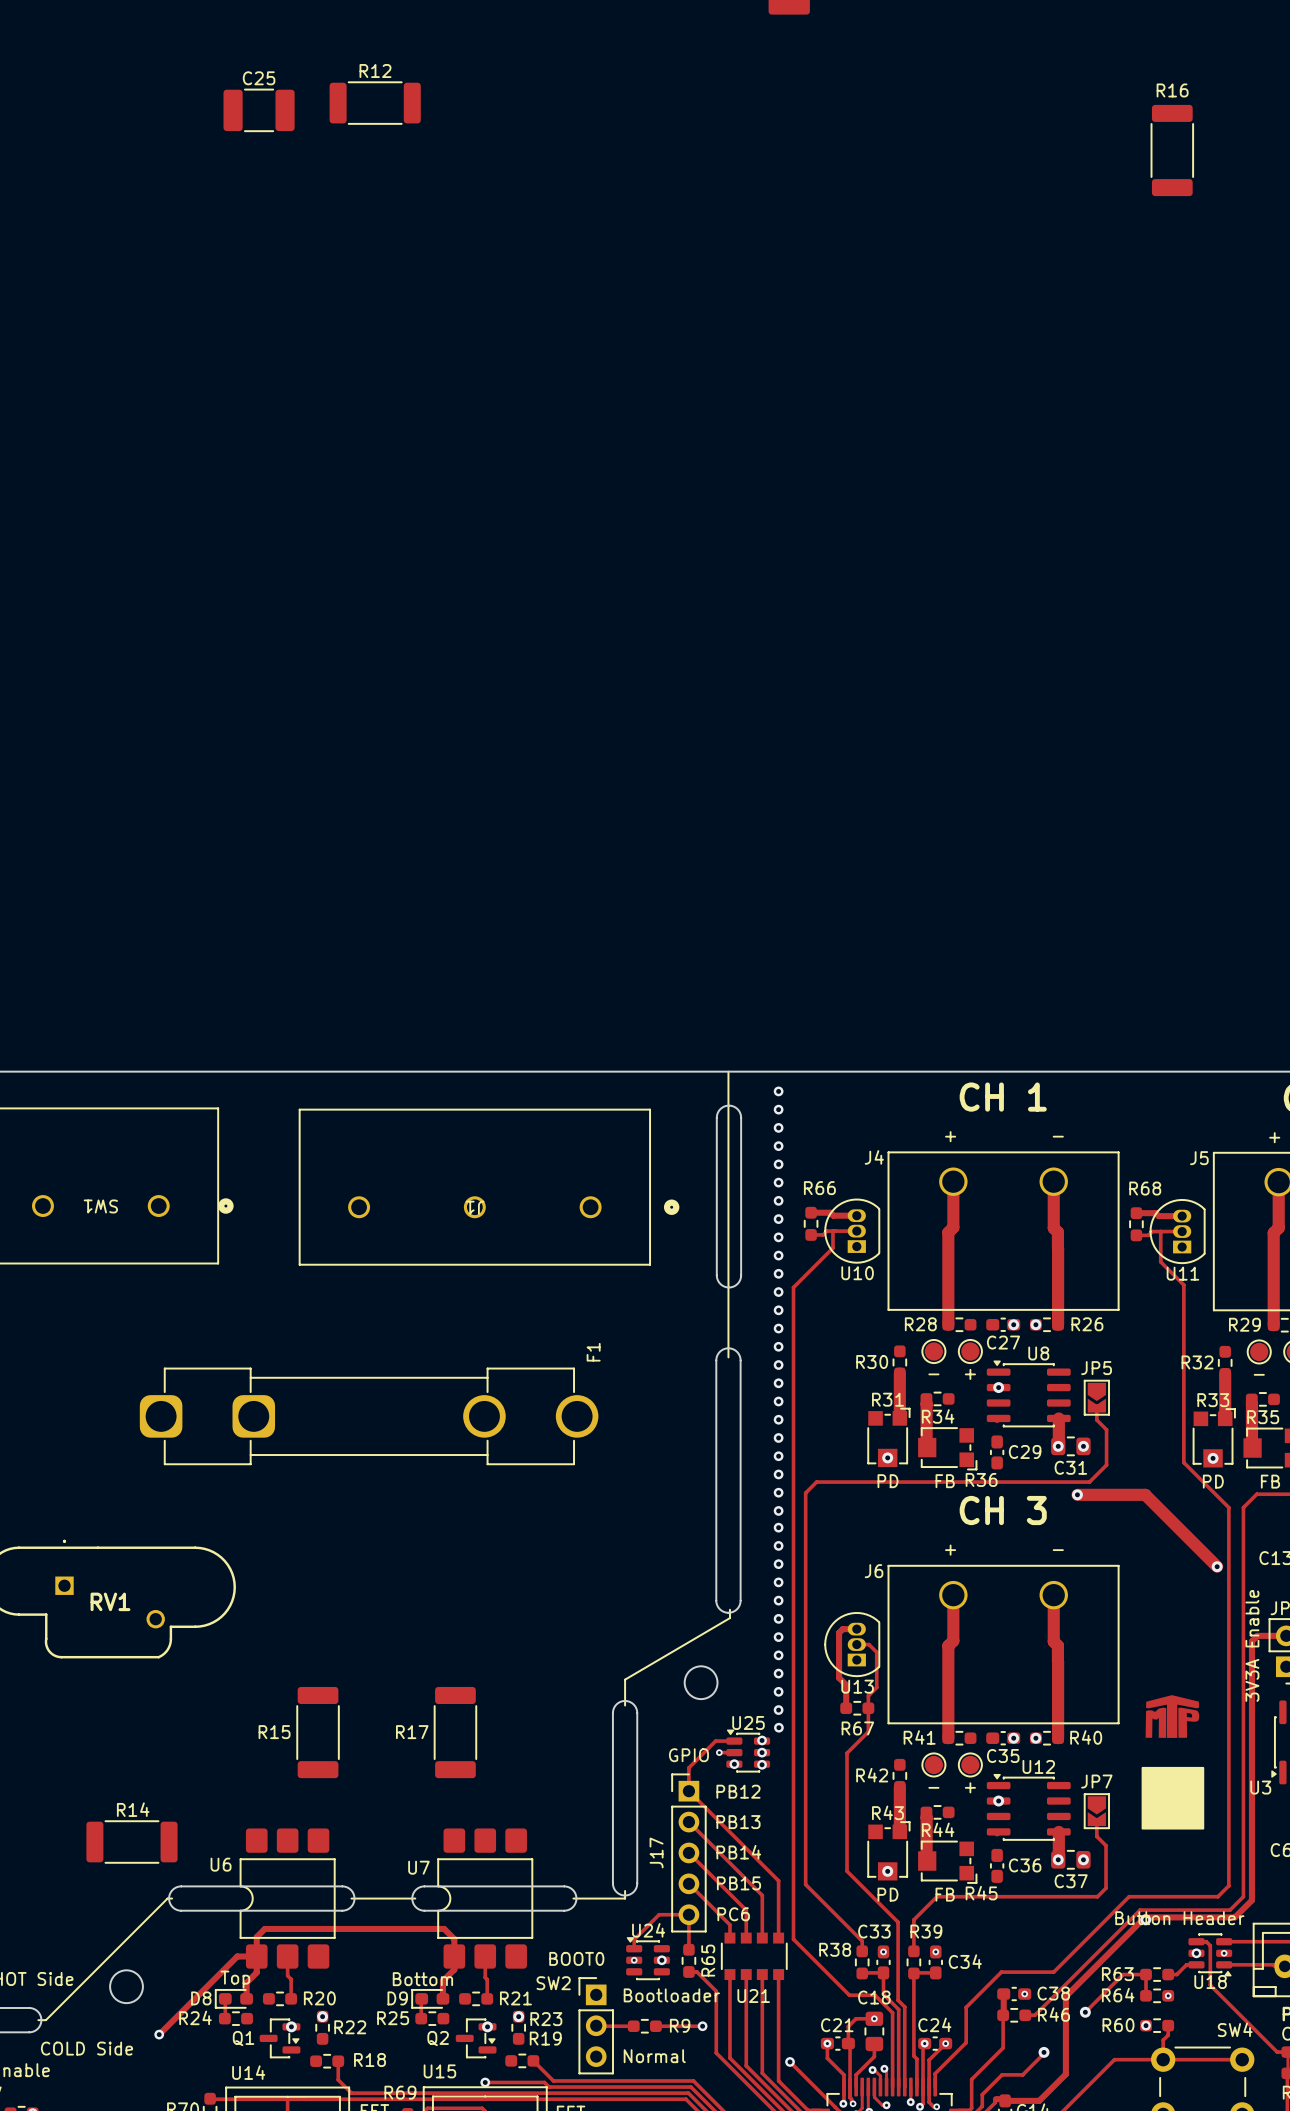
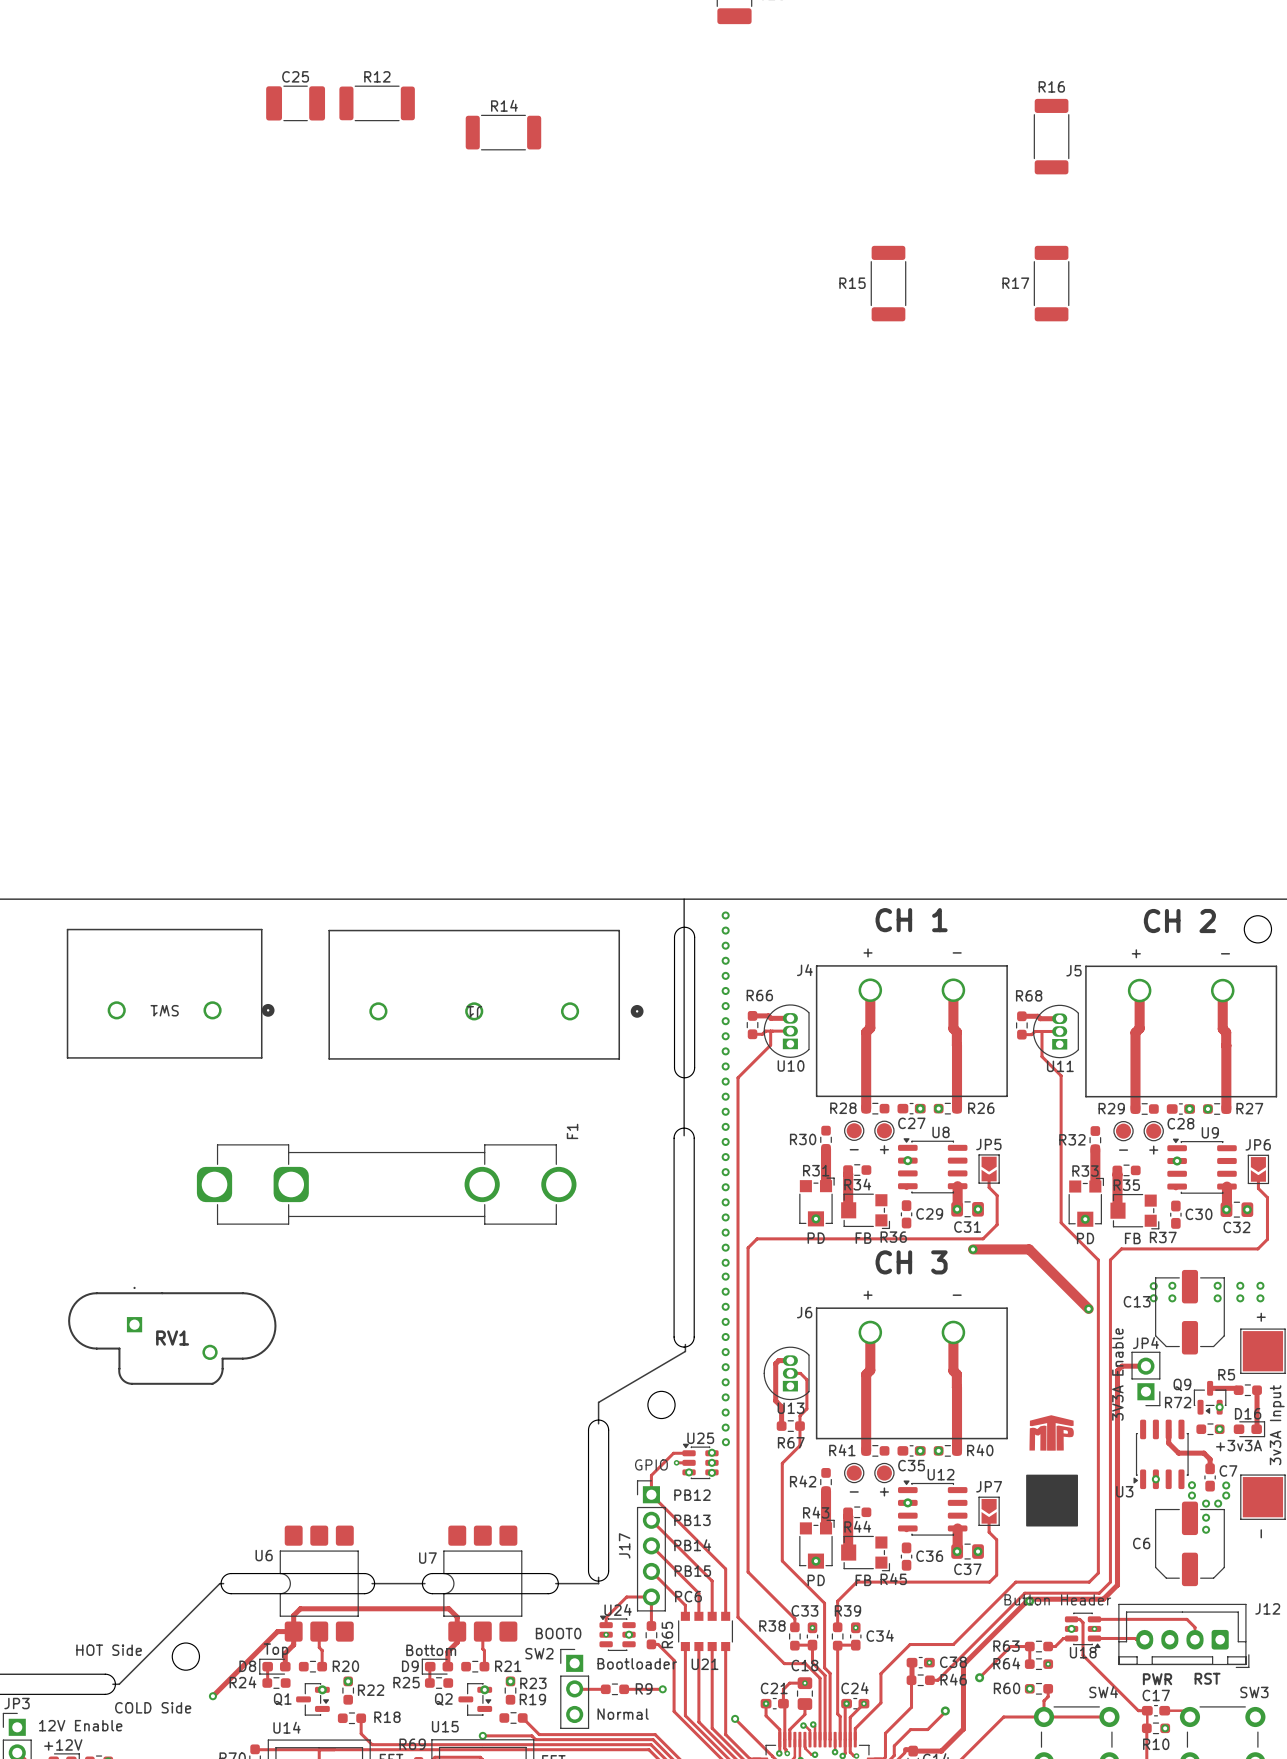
R12 position: (375, 103) -> (377, 103)
R15 position: (318, 1732) -> (888, 283)
R17 position: (455, 1732) -> (1051, 283)
R14 position: (131, 1842) -> (503, 132)

